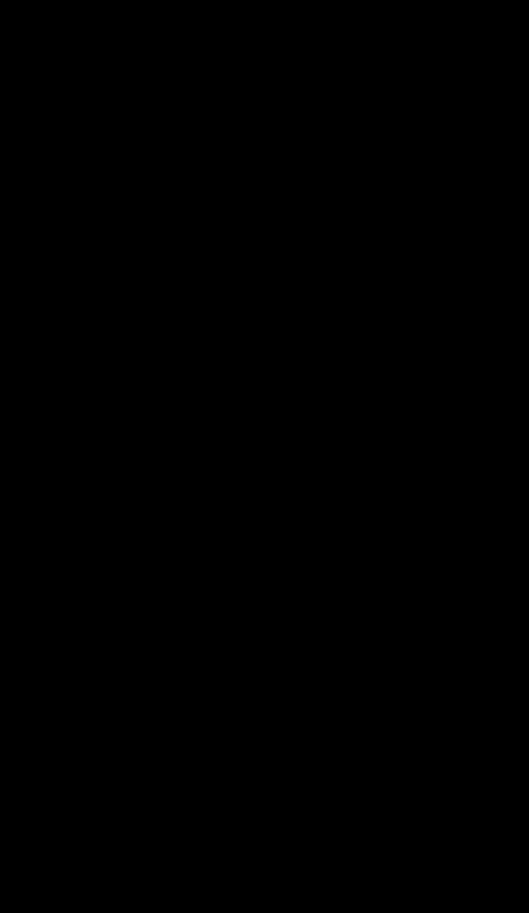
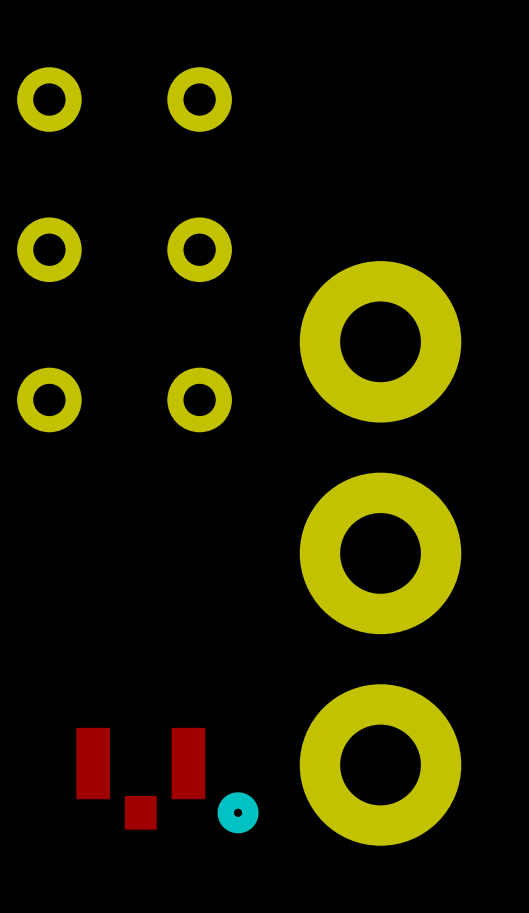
part: none -> (49, 99)
part: none -> (199, 99)
part: none -> (49, 249)
part: none -> (199, 249)
part: none -> (380, 341)
part: none -> (49, 399)
part: none -> (199, 399)
part: none -> (380, 553)
part: none -> (380, 765)
part: none -> (167, 780)

